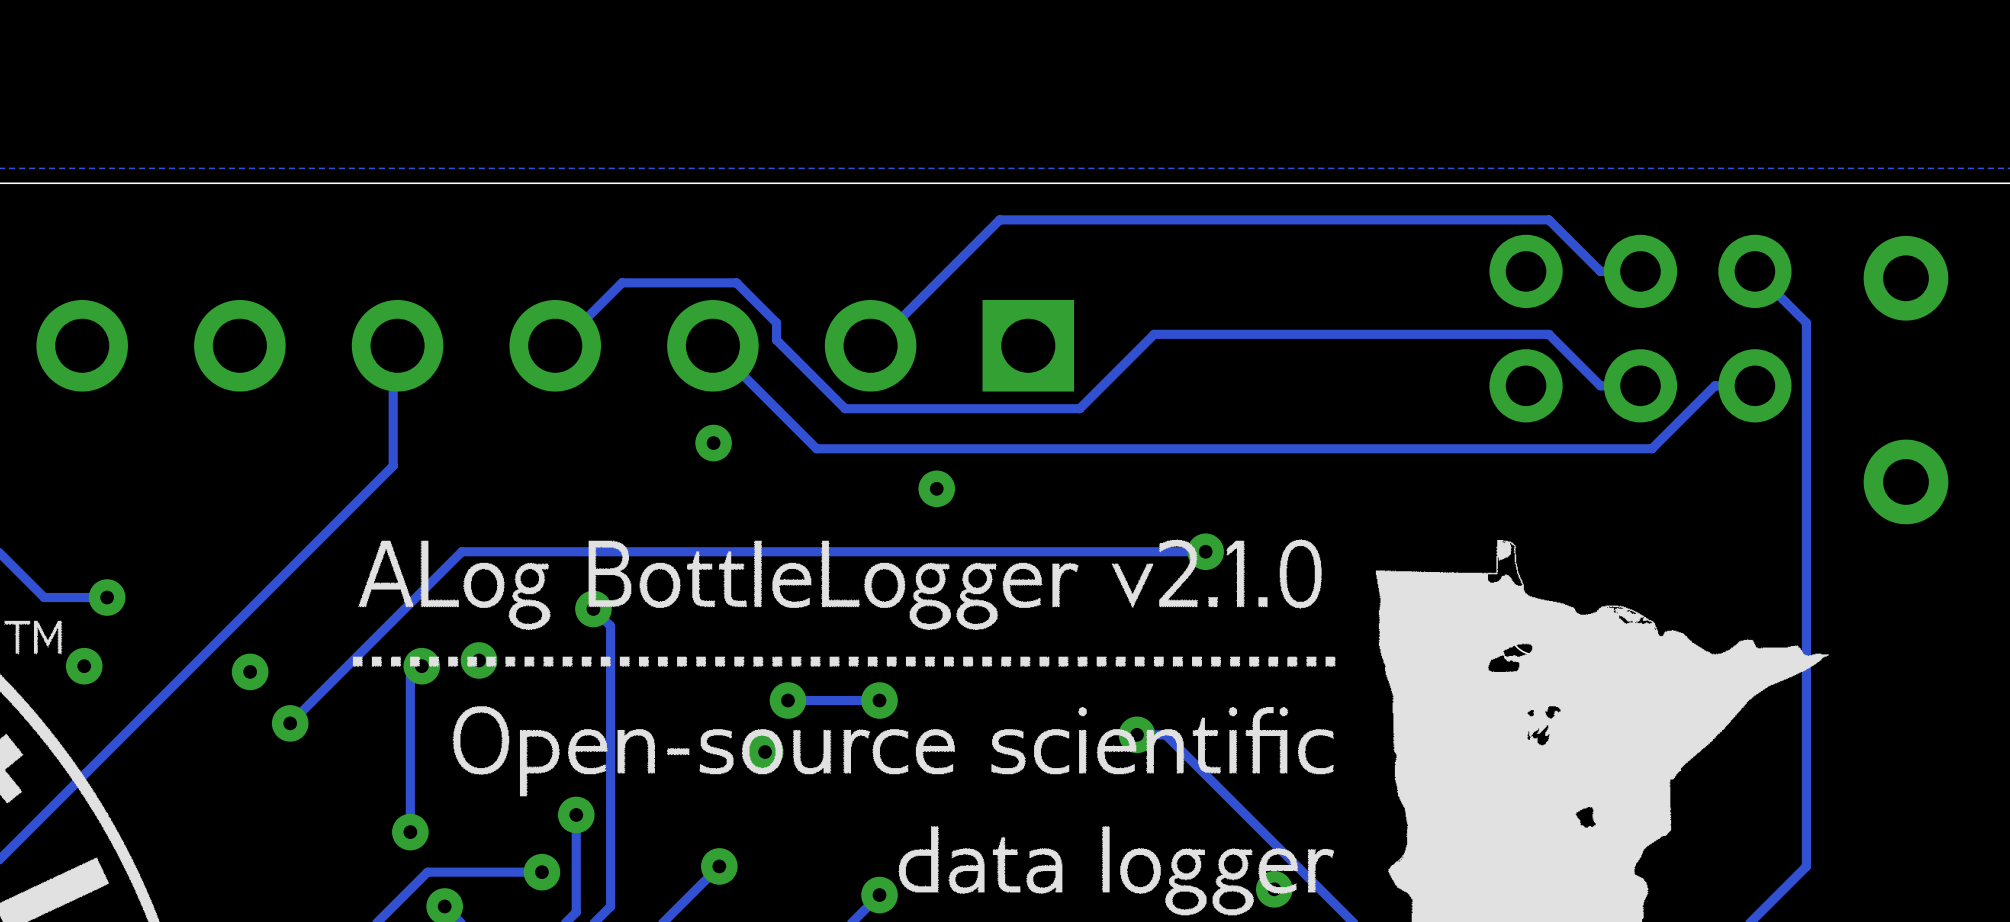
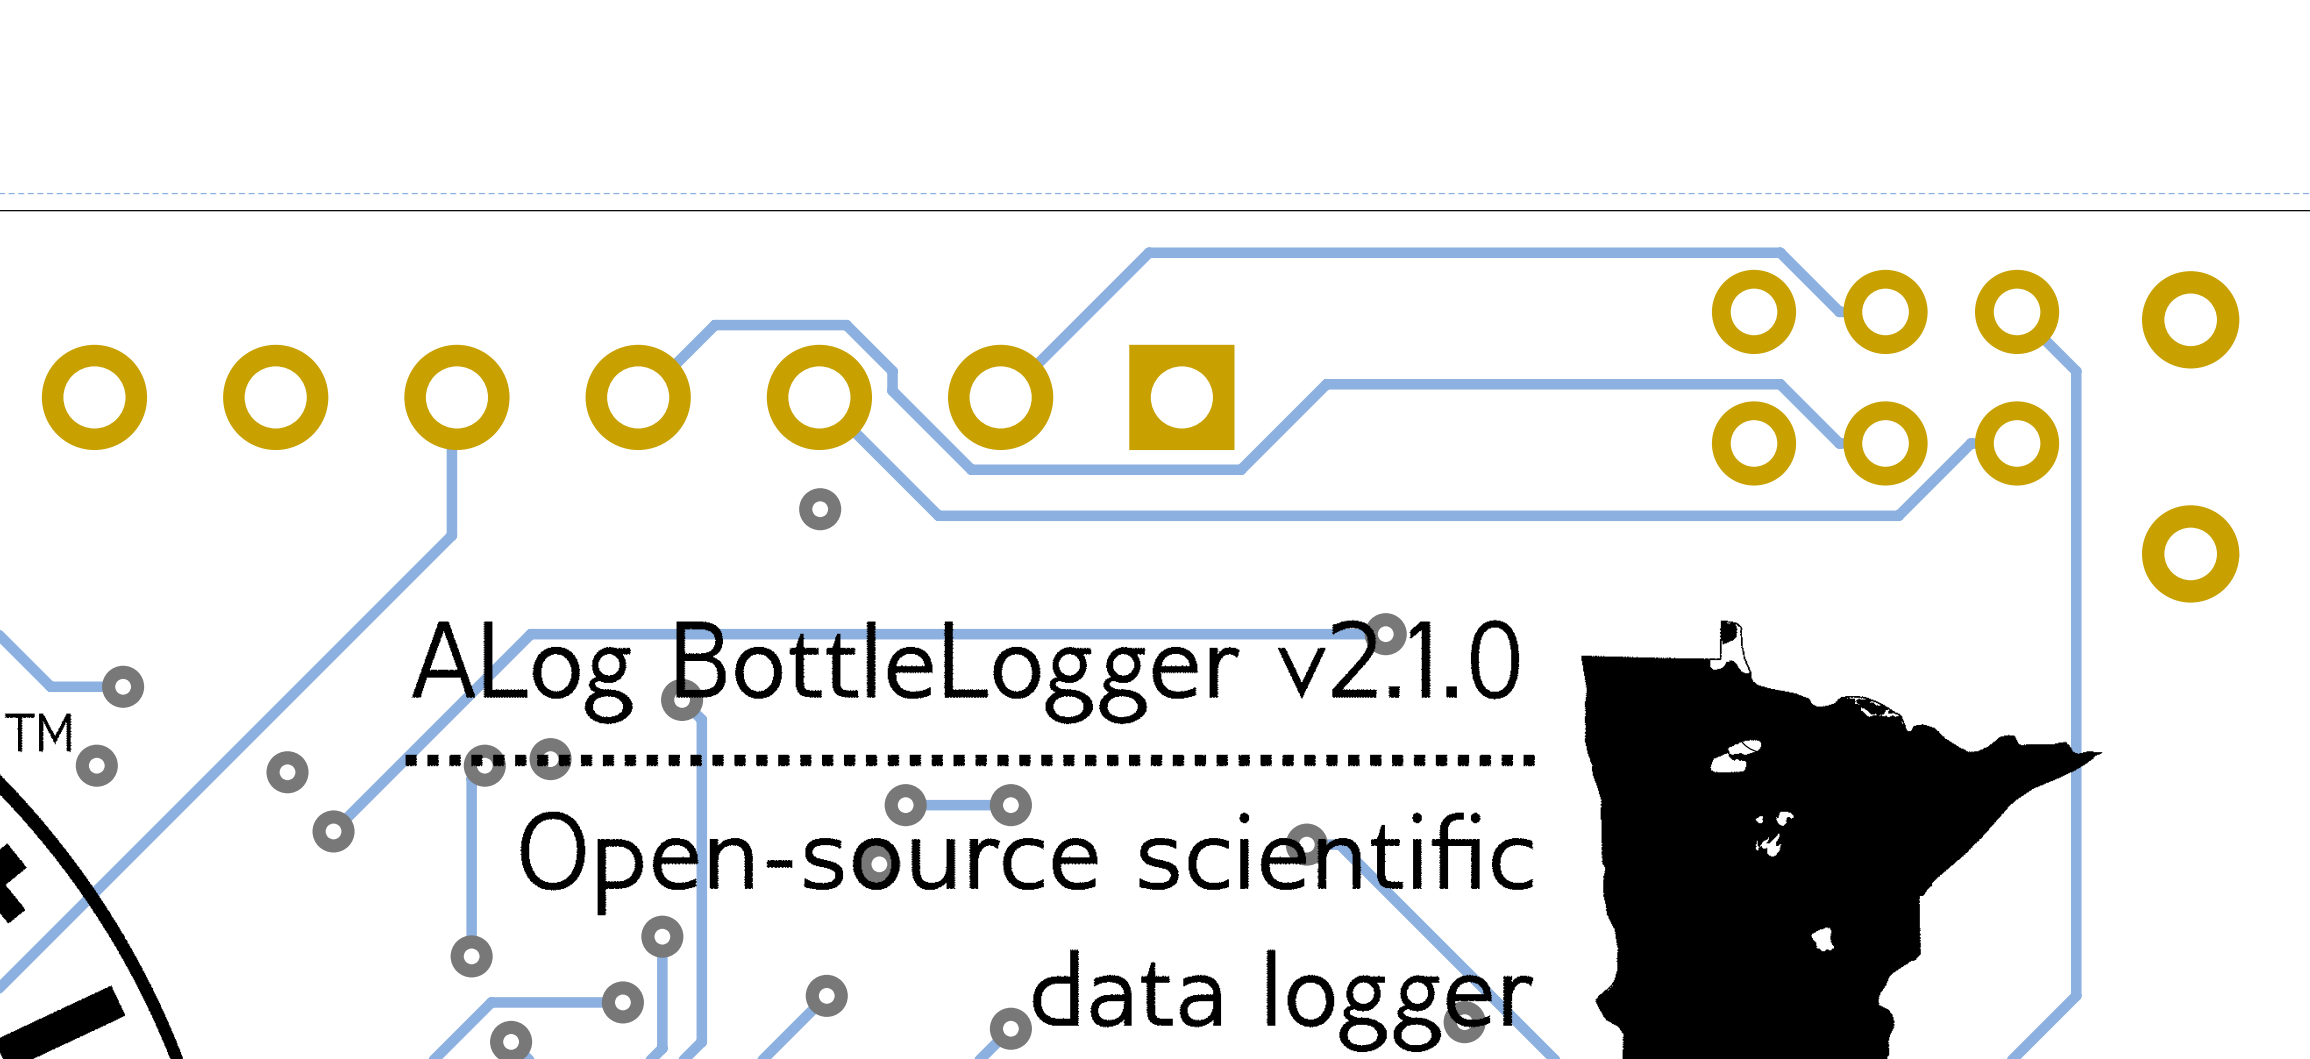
via: (936, 488) -> none

